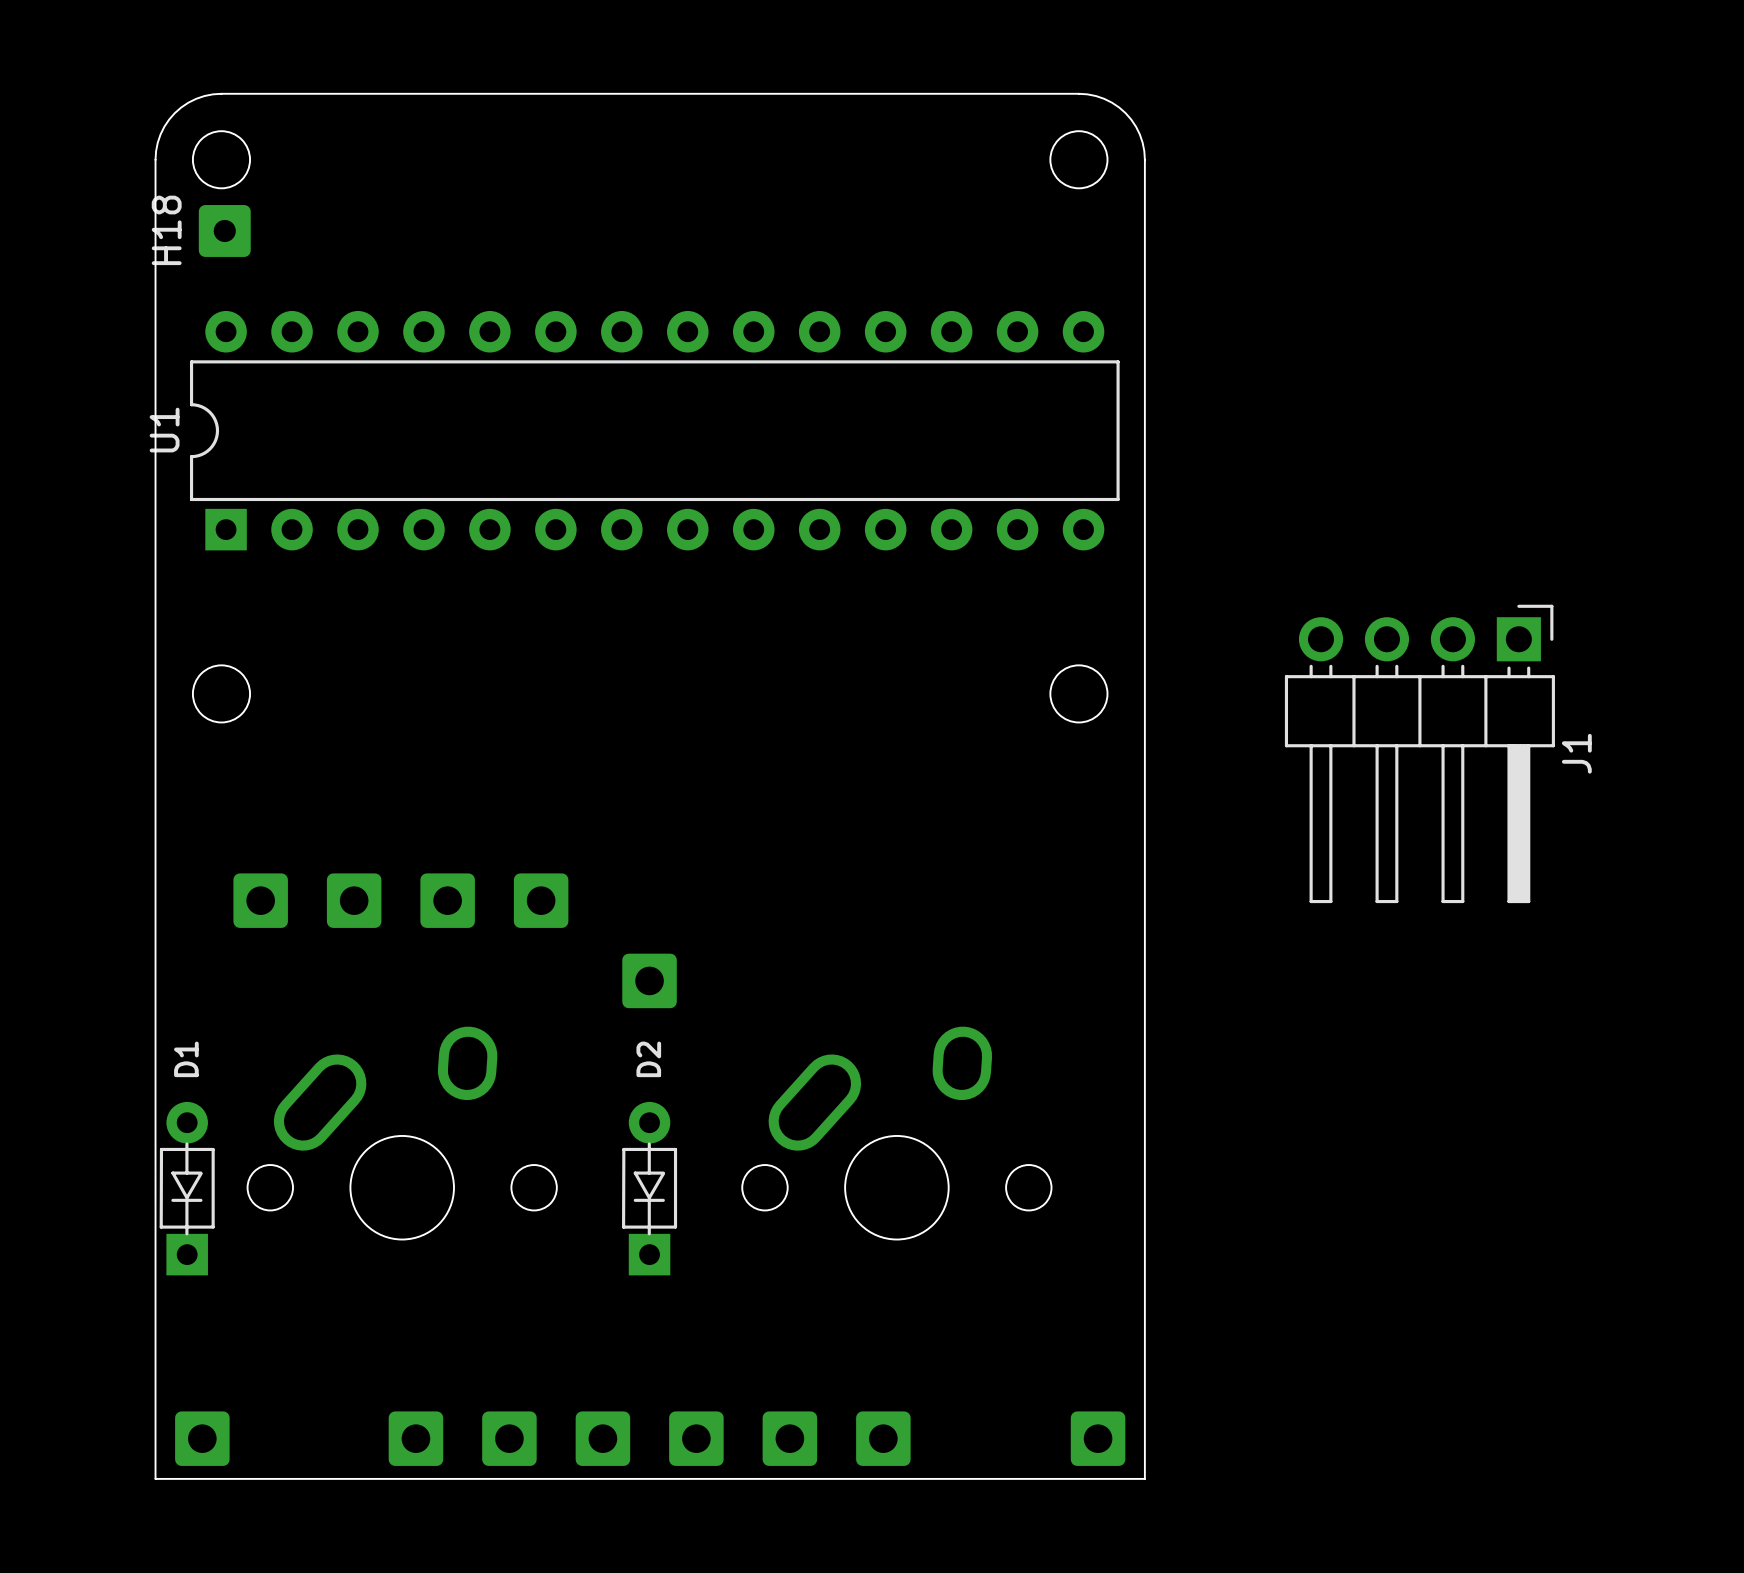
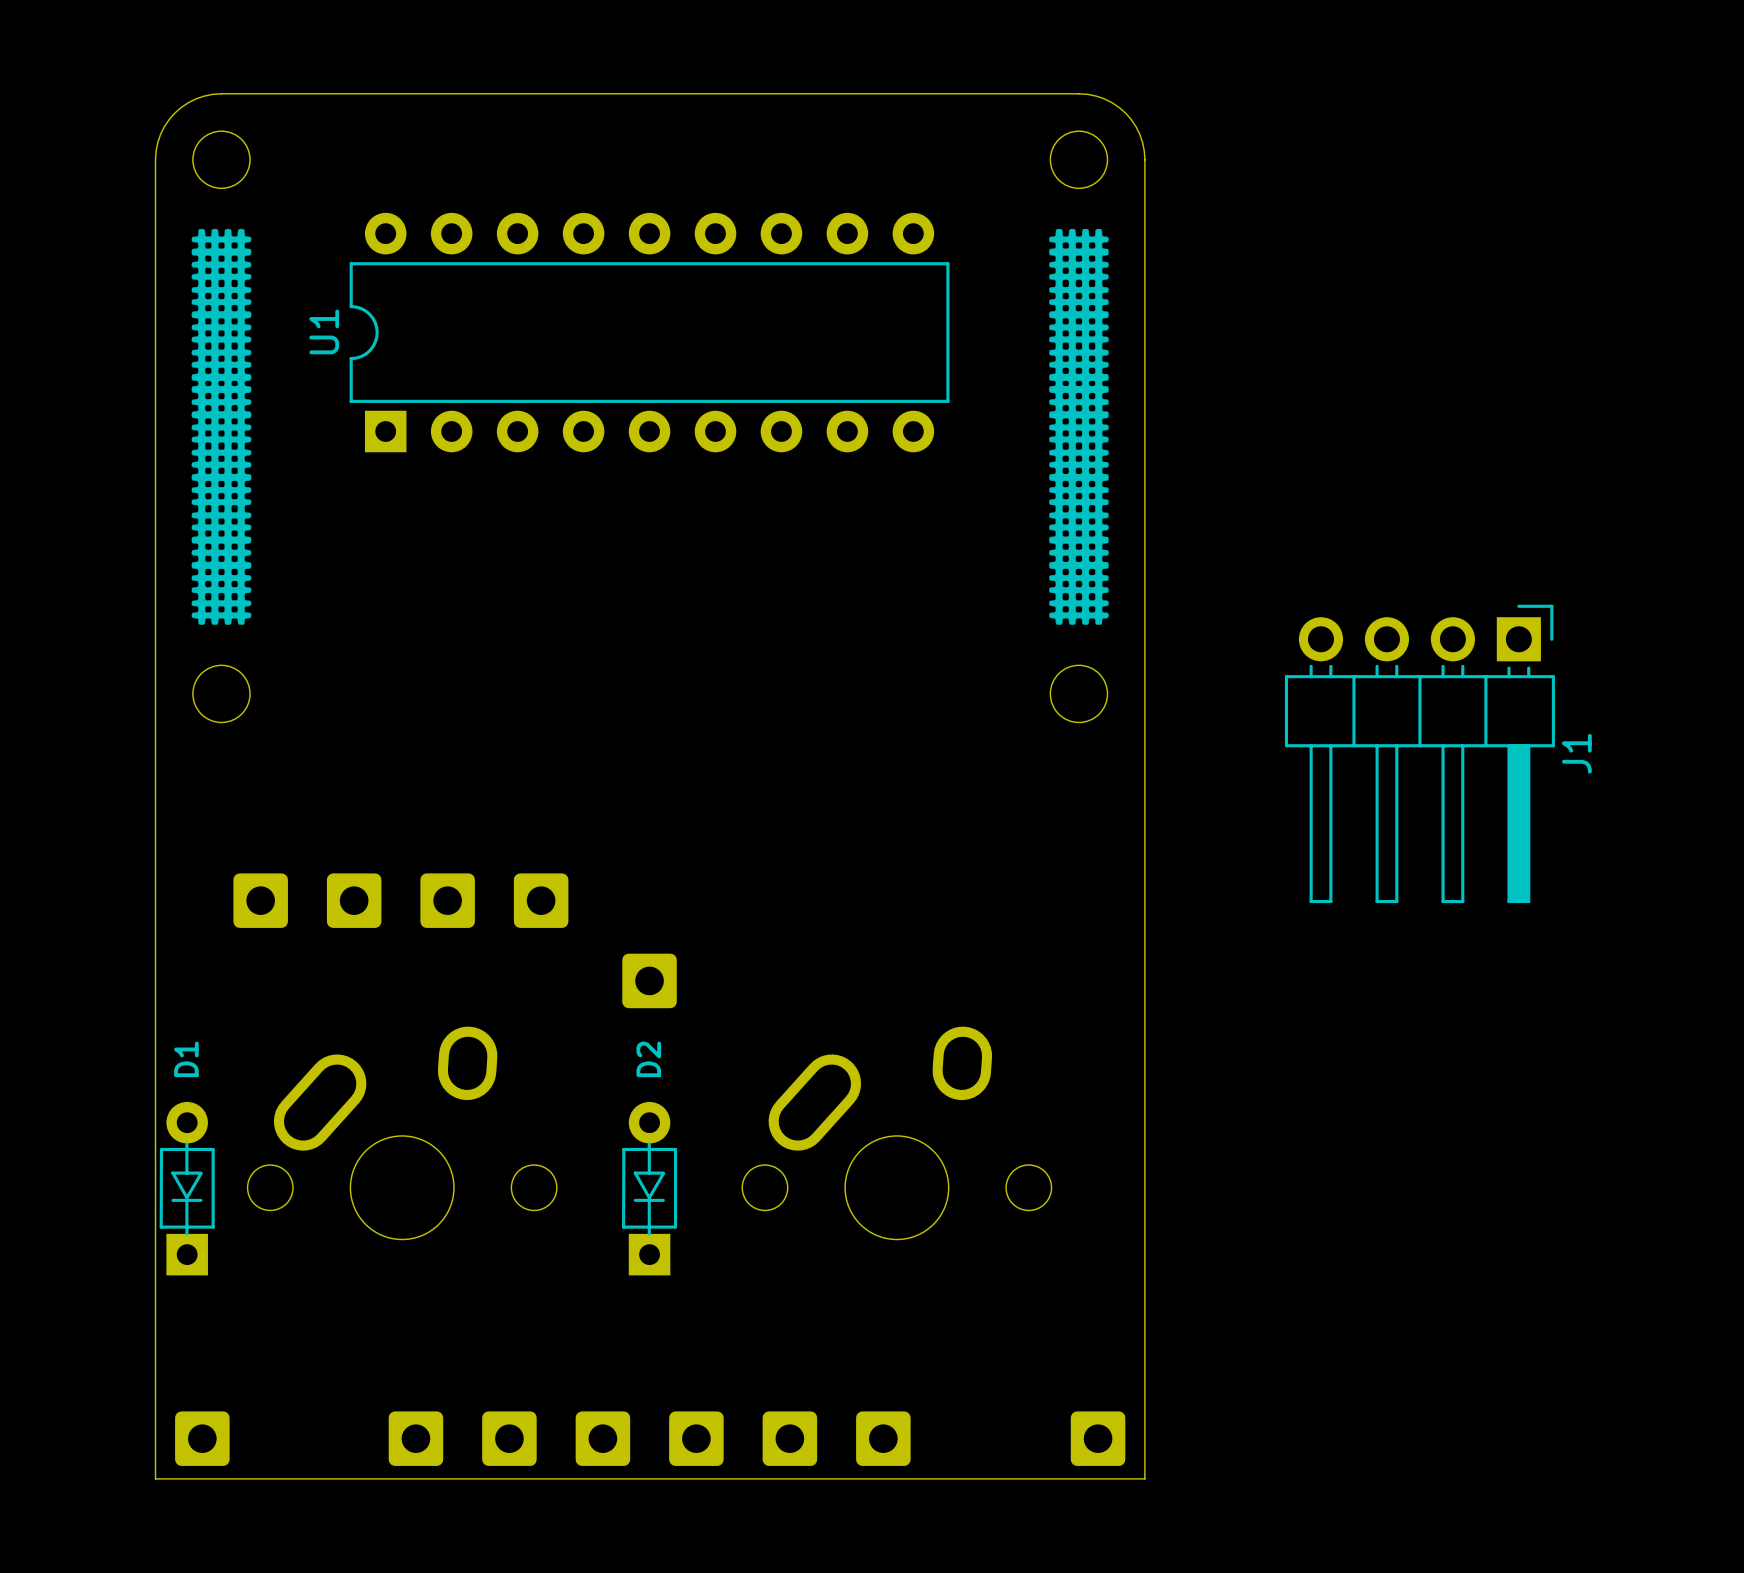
drawing: none -> [191, 228, 252, 625]
drawing: none -> [1049, 228, 1109, 625]
H18: (224, 230) -> none
U1 footprint: [189, 310, 1120, 551] -> [349, 212, 950, 453]
U1 name position: U1 (164, 430) -> U1 (324, 331)

